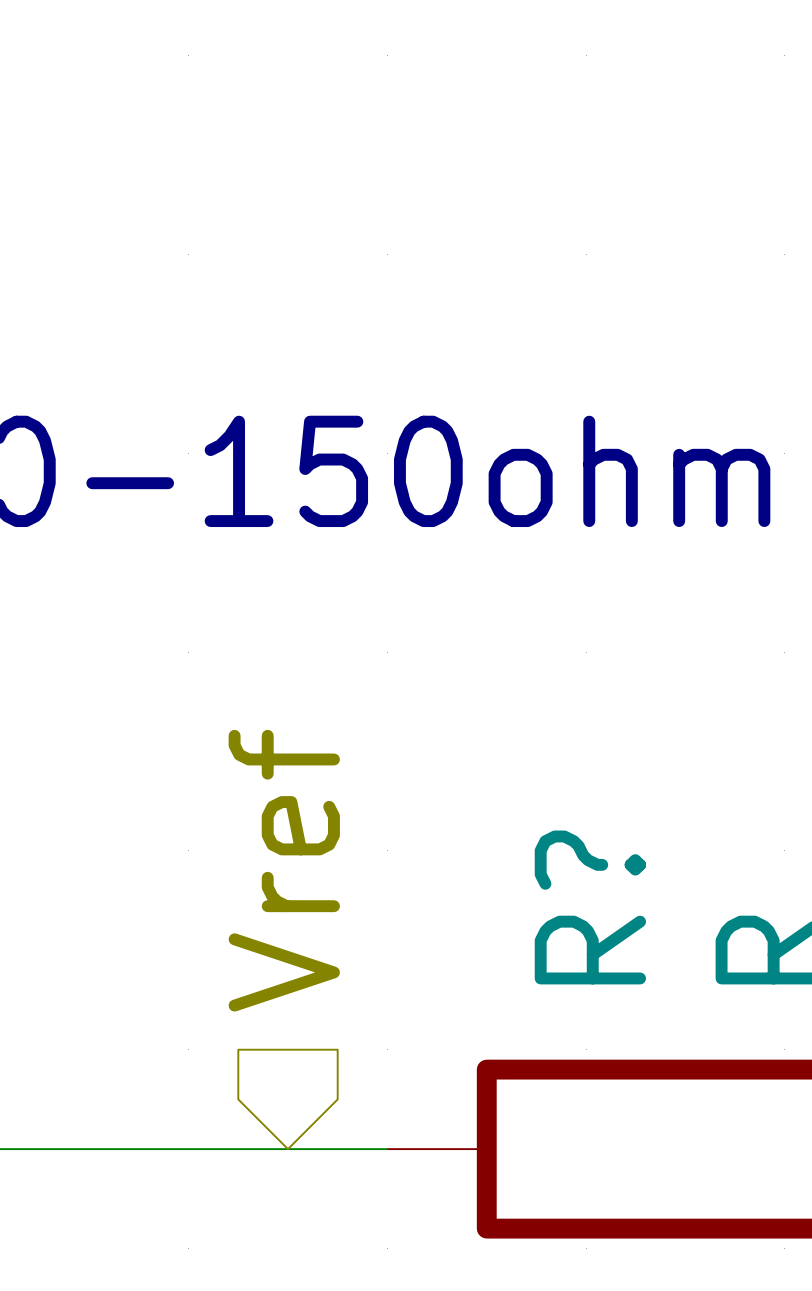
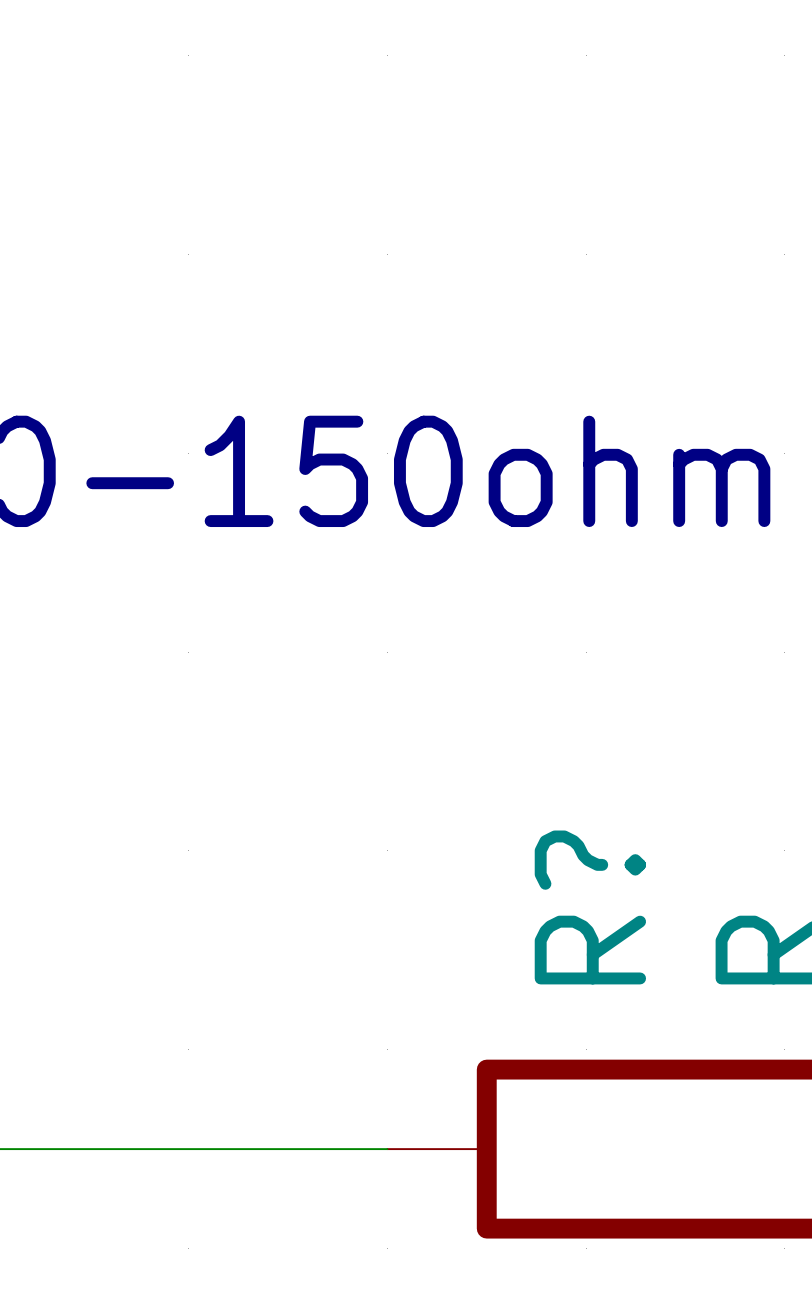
hierarchical label: Vref (284, 870) -> none

